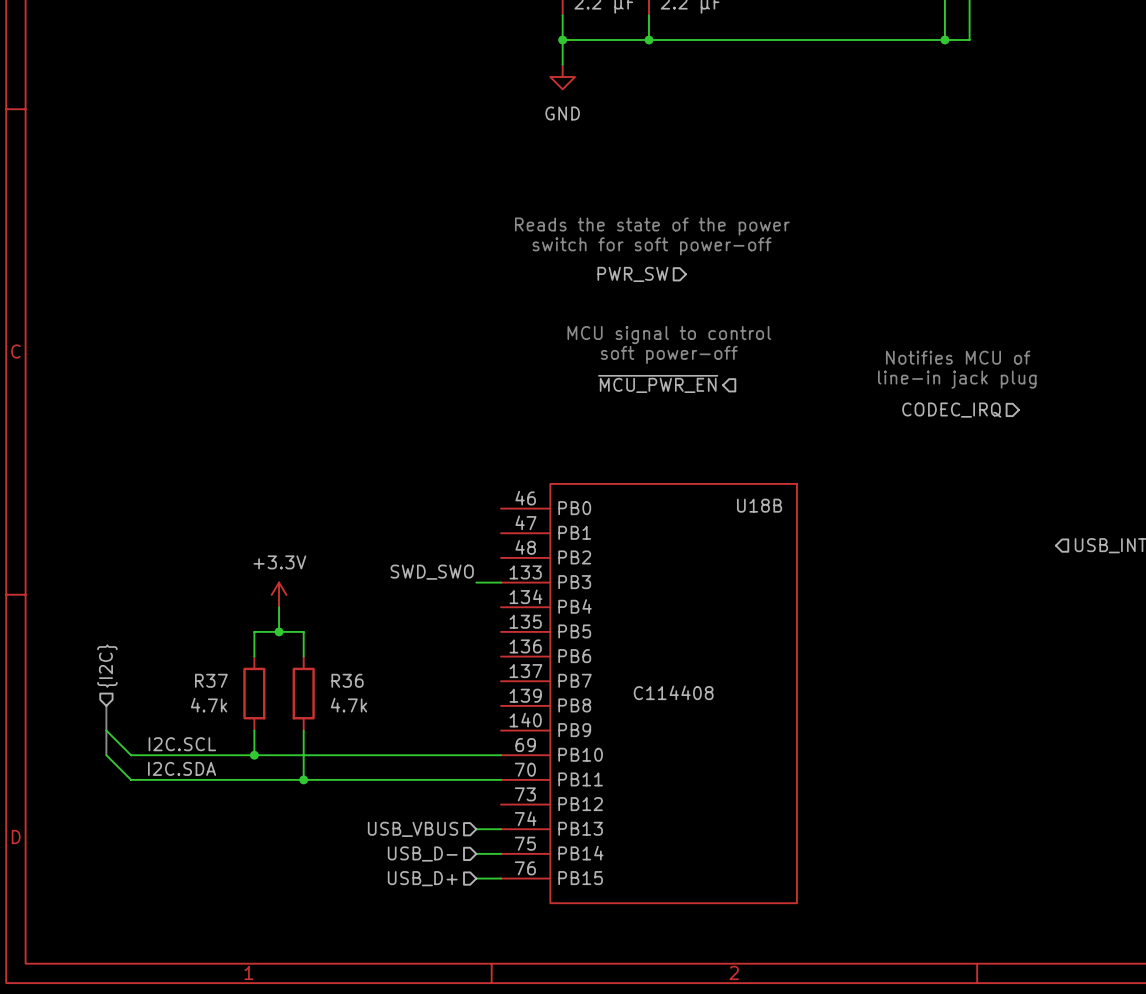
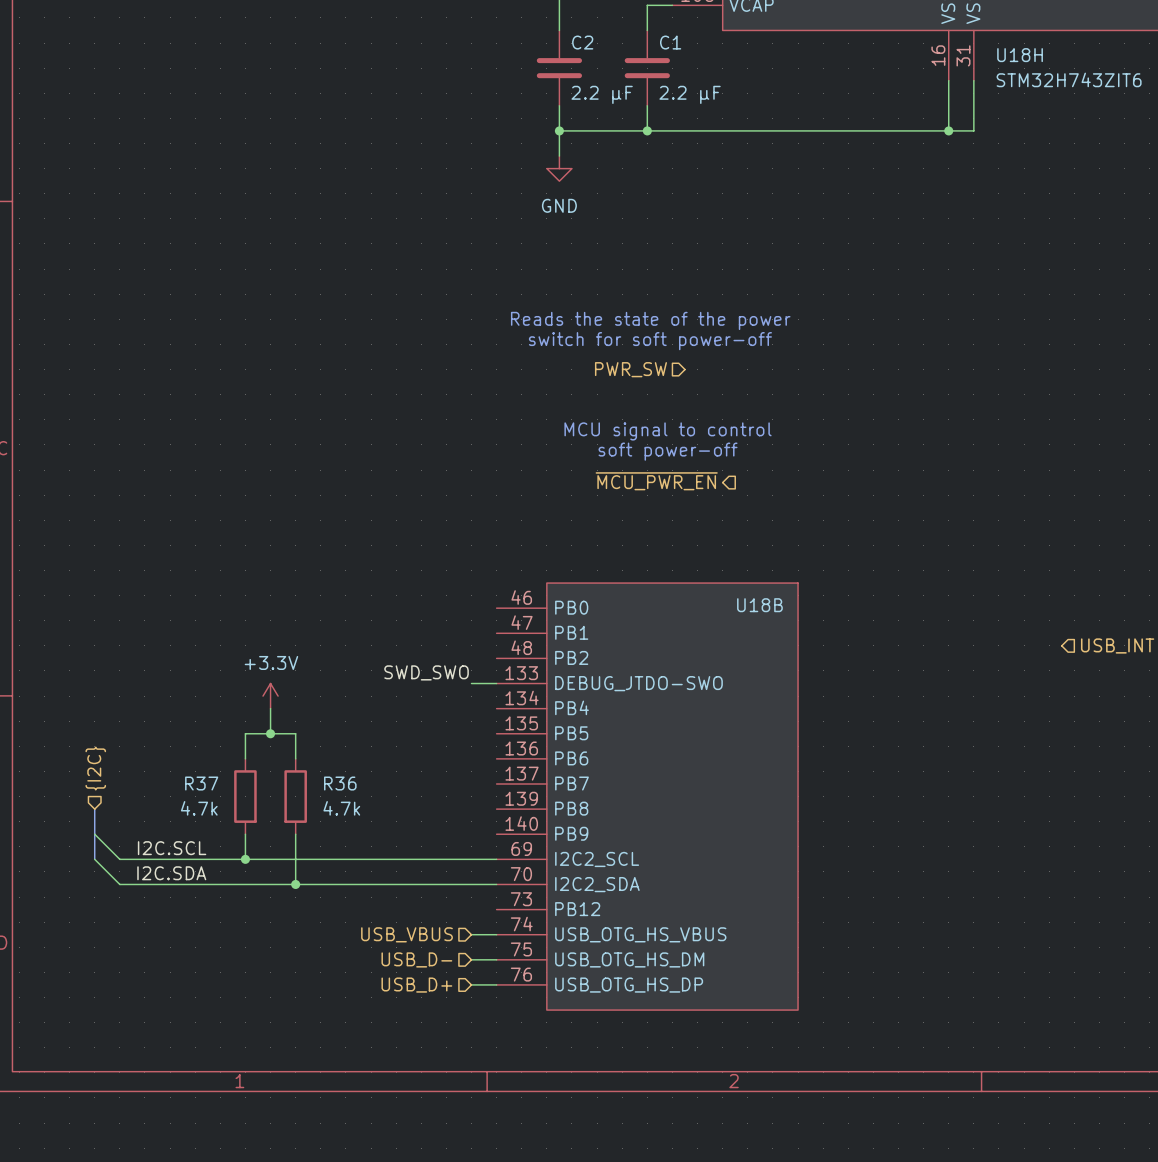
text: Notifies MCU of (958, 357) -> none
text: line-in jack plug (957, 379) -> none
hierarchical label: CODEC_IRQ (951, 410) -> none
U18B pin name: PB3 (574, 582) -> DEBUG_JTDO-SWO (638, 683)
U18B text: C114408 (673, 692) -> none
U18B pin name: PB10 (580, 754) -> I2C2_SCL (597, 859)
U18B pin name: PB11 (580, 779) -> I2C2_SDA (597, 884)
U18B pin name: PB13 (580, 828) -> USB_OTG_HS_VBUS (640, 934)
U18B pin name: PB14 (580, 853) -> USB_OTG_HS_DM (629, 959)
U18B pin name: PB15 (580, 878) -> USB_OTG_HS_DP (629, 985)

